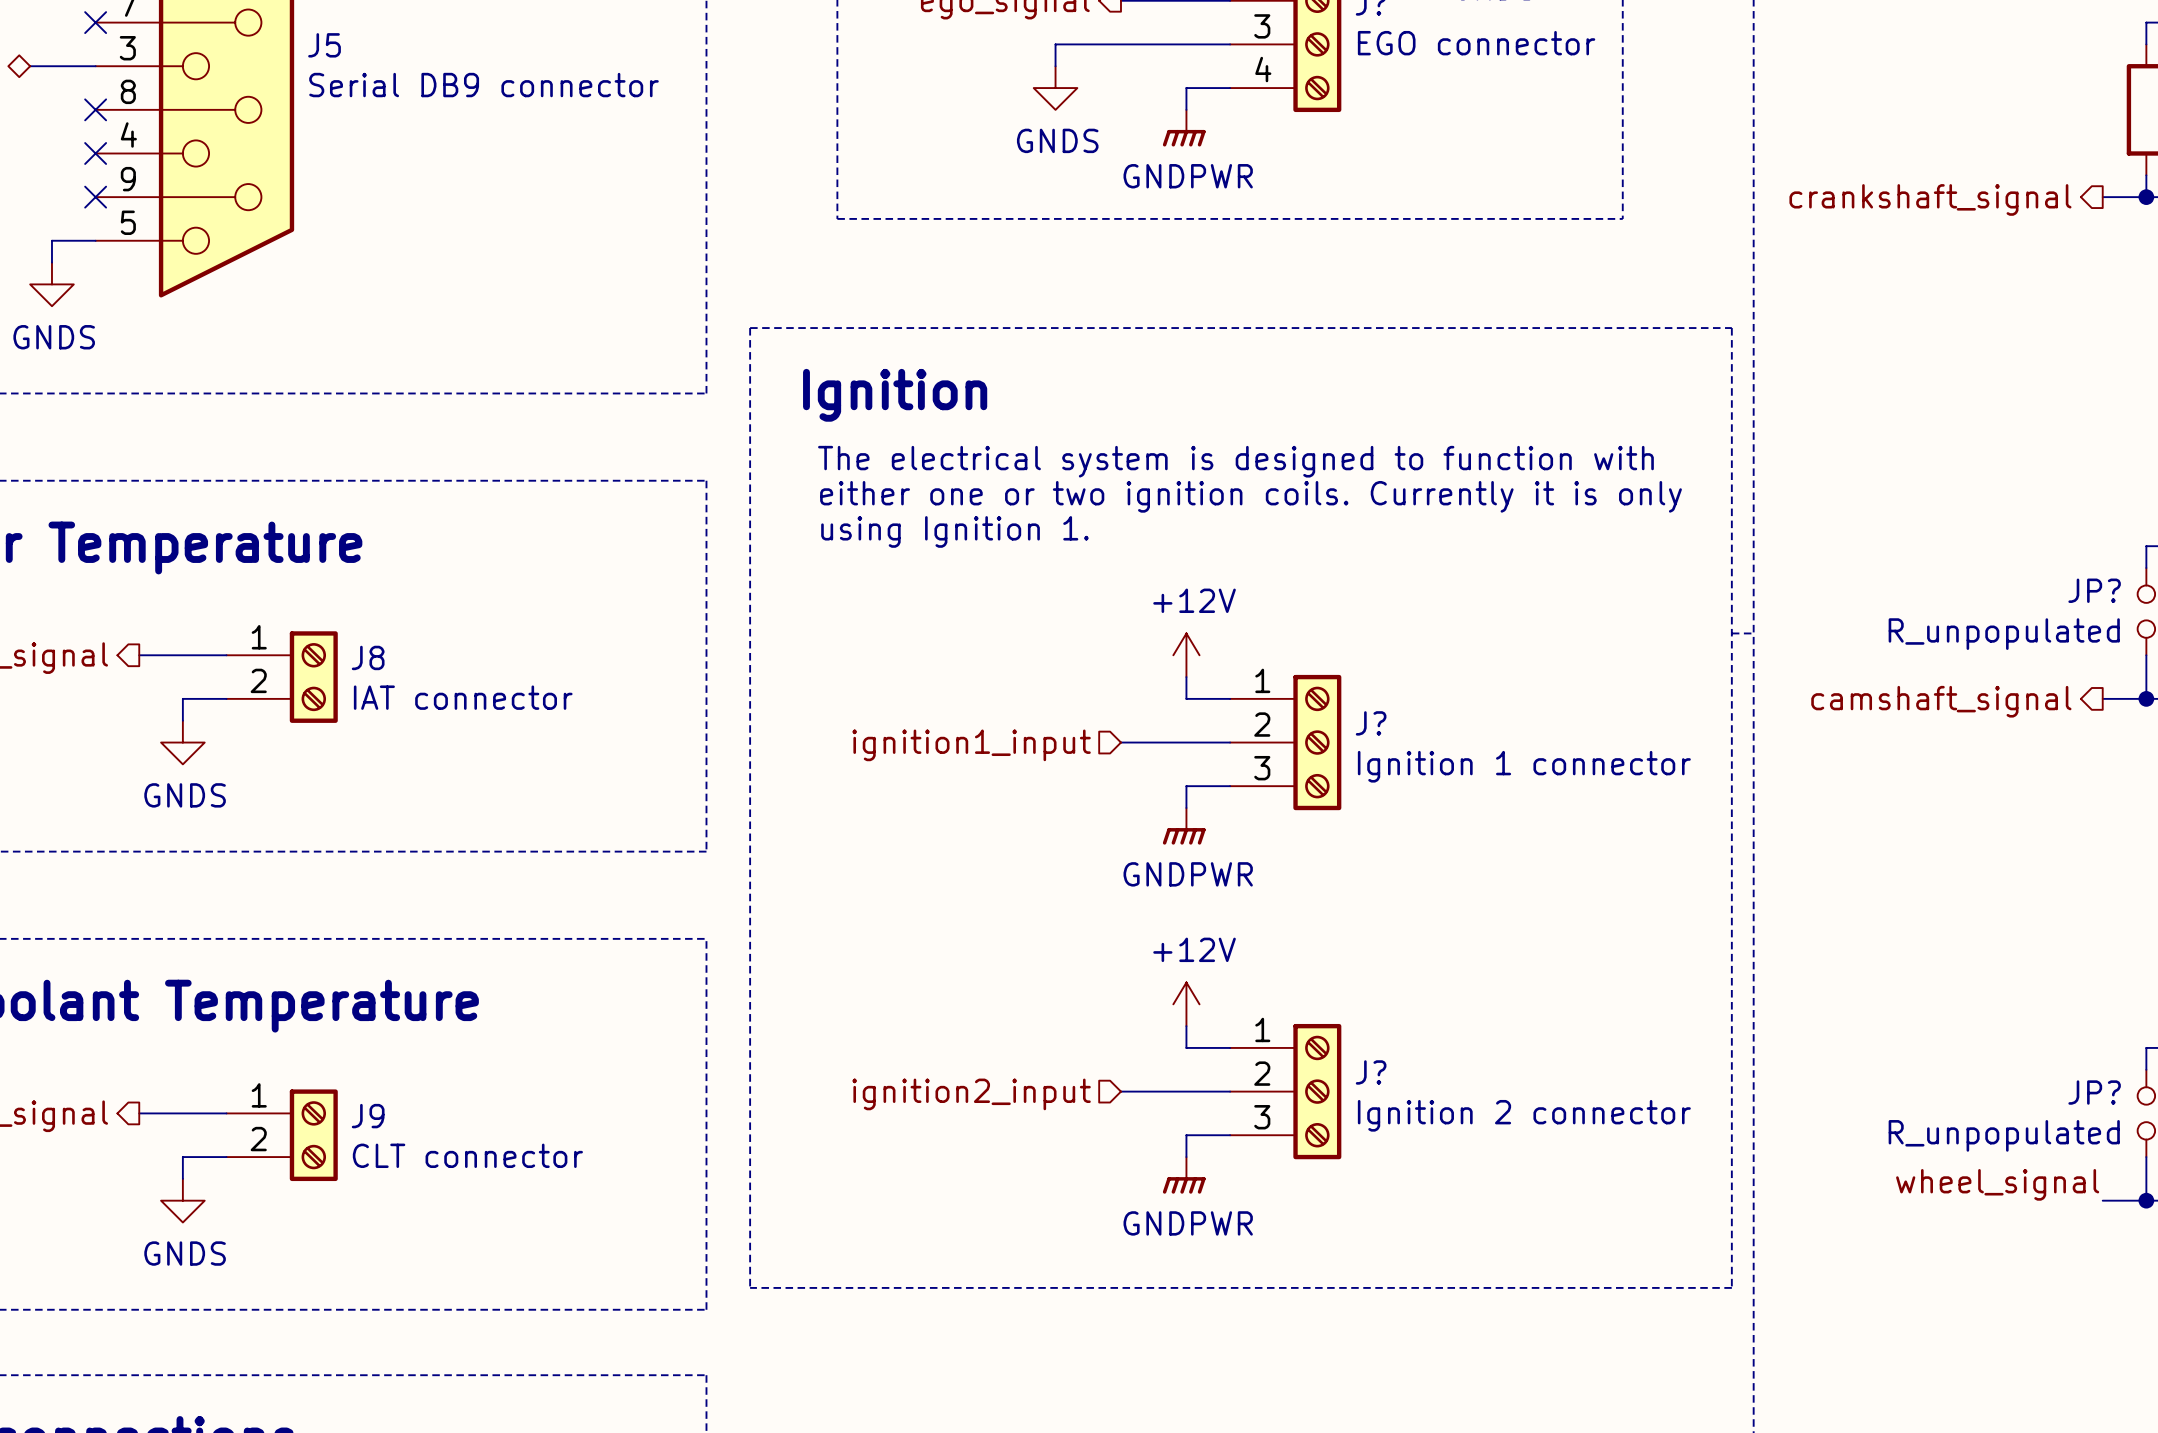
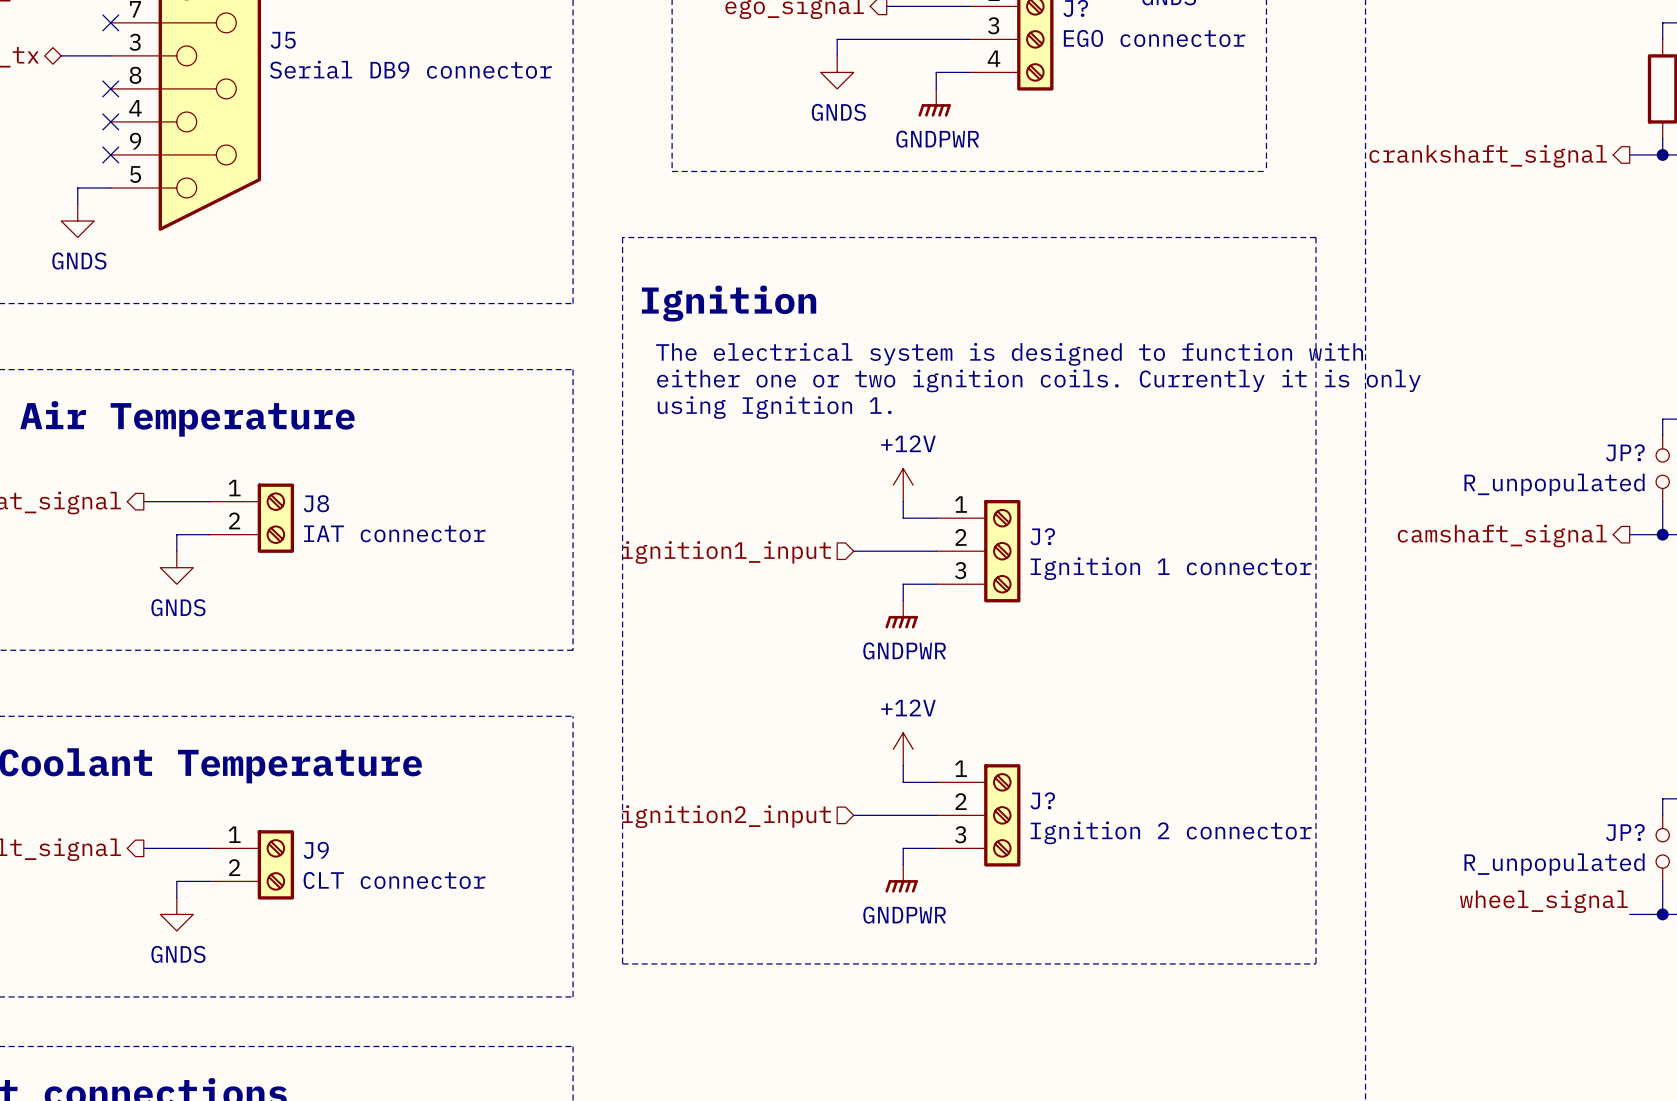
line: (750, 328) (1731, 328) (1731, 1287) (750, 1287) (750, 328) -> (622, 237) (622, 963) (1315, 963) (1315, 237) (622, 237)
line: (1731, 633) (1753, 633) -> none
power symbol position: +12V (1186, 655) -> +12V (903, 485)
wire: (1186, 677) (1186, 698) (1230, 698) -> (936, 518) (903, 518) (903, 501)
wire: (1120, 742) (1230, 742) -> (853, 551) (936, 551)
J? position: (1285, 742) -> (978, 551)
hierarchical label position: ignition1_input (971, 745) -> ignition1_input (726, 552)
wire: (1230, 786) (1186, 786) (1186, 807) -> (936, 584) (903, 584) (903, 600)
power symbol position: GNDPWR (1184, 826) -> GNDPWR (901, 614)
power symbol position: +12V (1186, 1004) -> +12V (903, 749)
wire: (1186, 1026) (1186, 1047) (1230, 1047) -> (936, 782) (903, 782) (903, 765)
wire: (1120, 1091) (1230, 1091) -> (853, 815) (936, 815)
J? position: (1285, 1091) -> (978, 815)
hierarchical label position: ignition2_input (971, 1094) -> ignition2_input (726, 816)
wire: (1230, 1135) (1186, 1135) (1186, 1157) -> (936, 848) (903, 848) (903, 864)
power symbol position: GNDPWR (1184, 1175) -> GNDPWR (901, 878)

